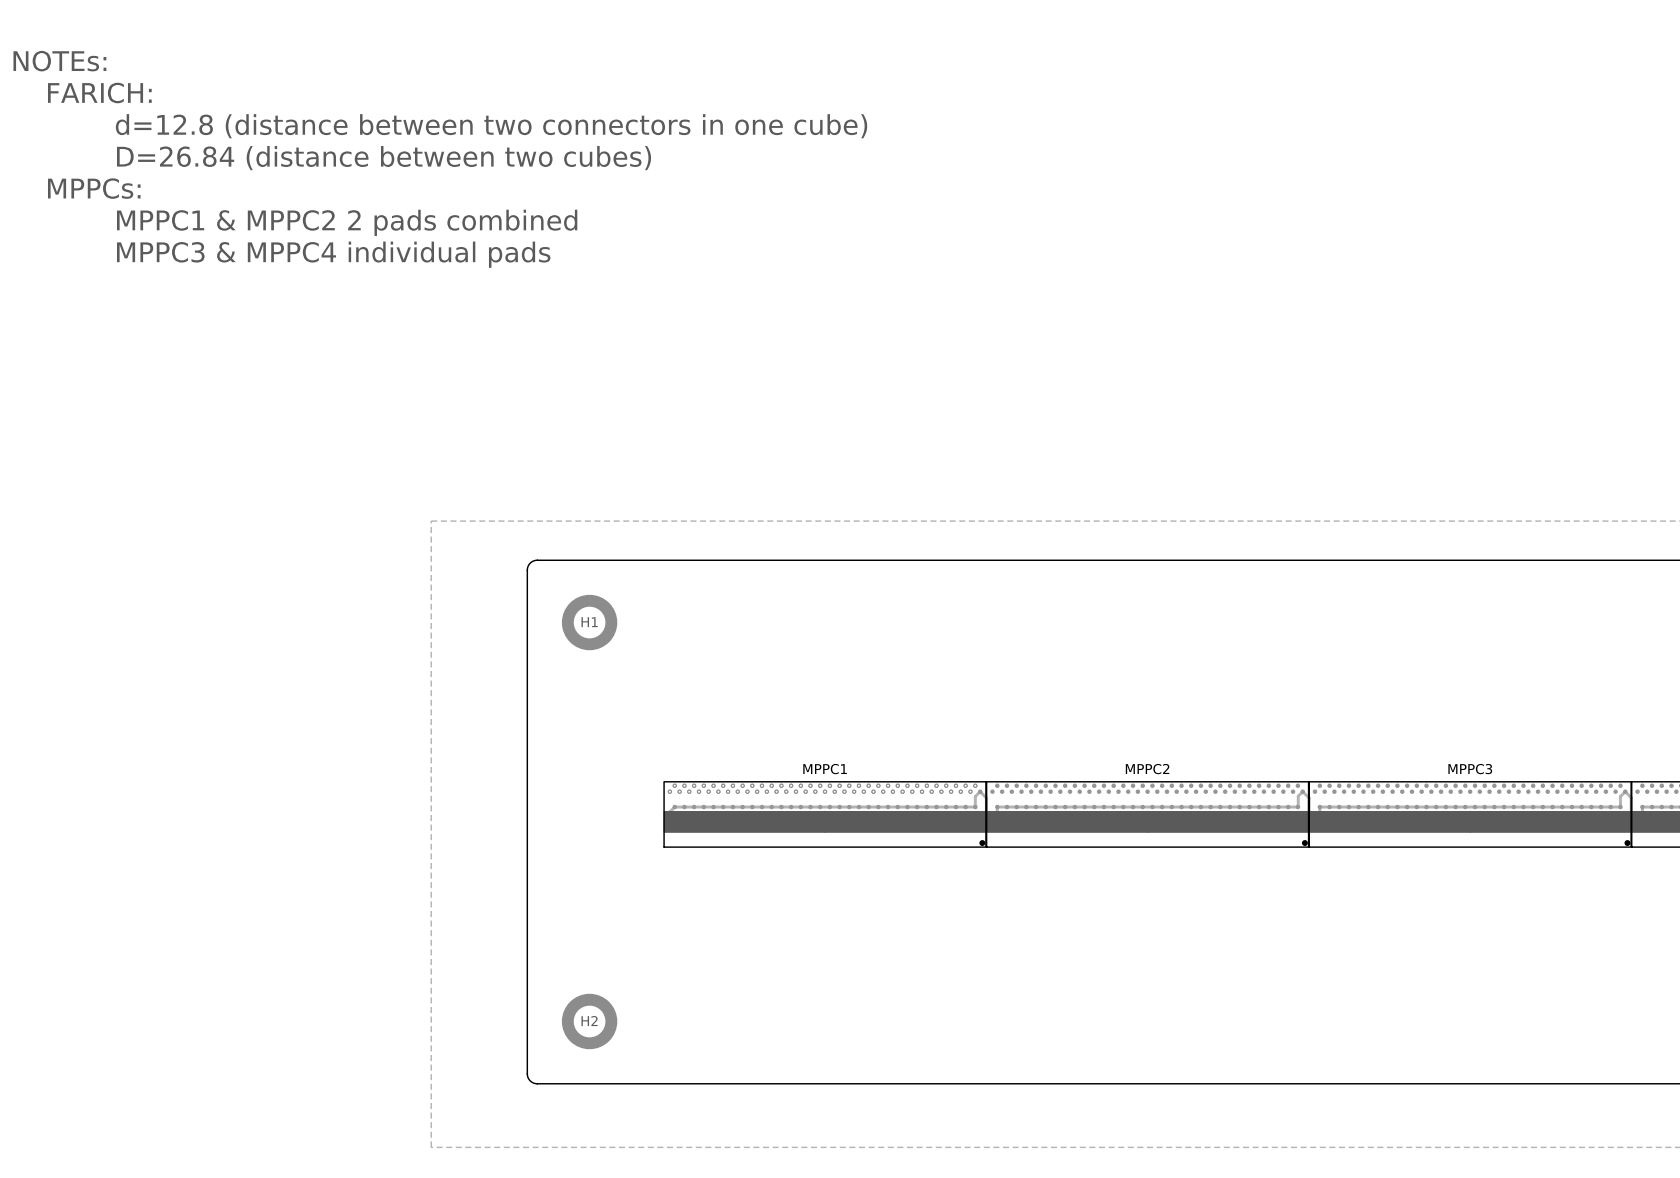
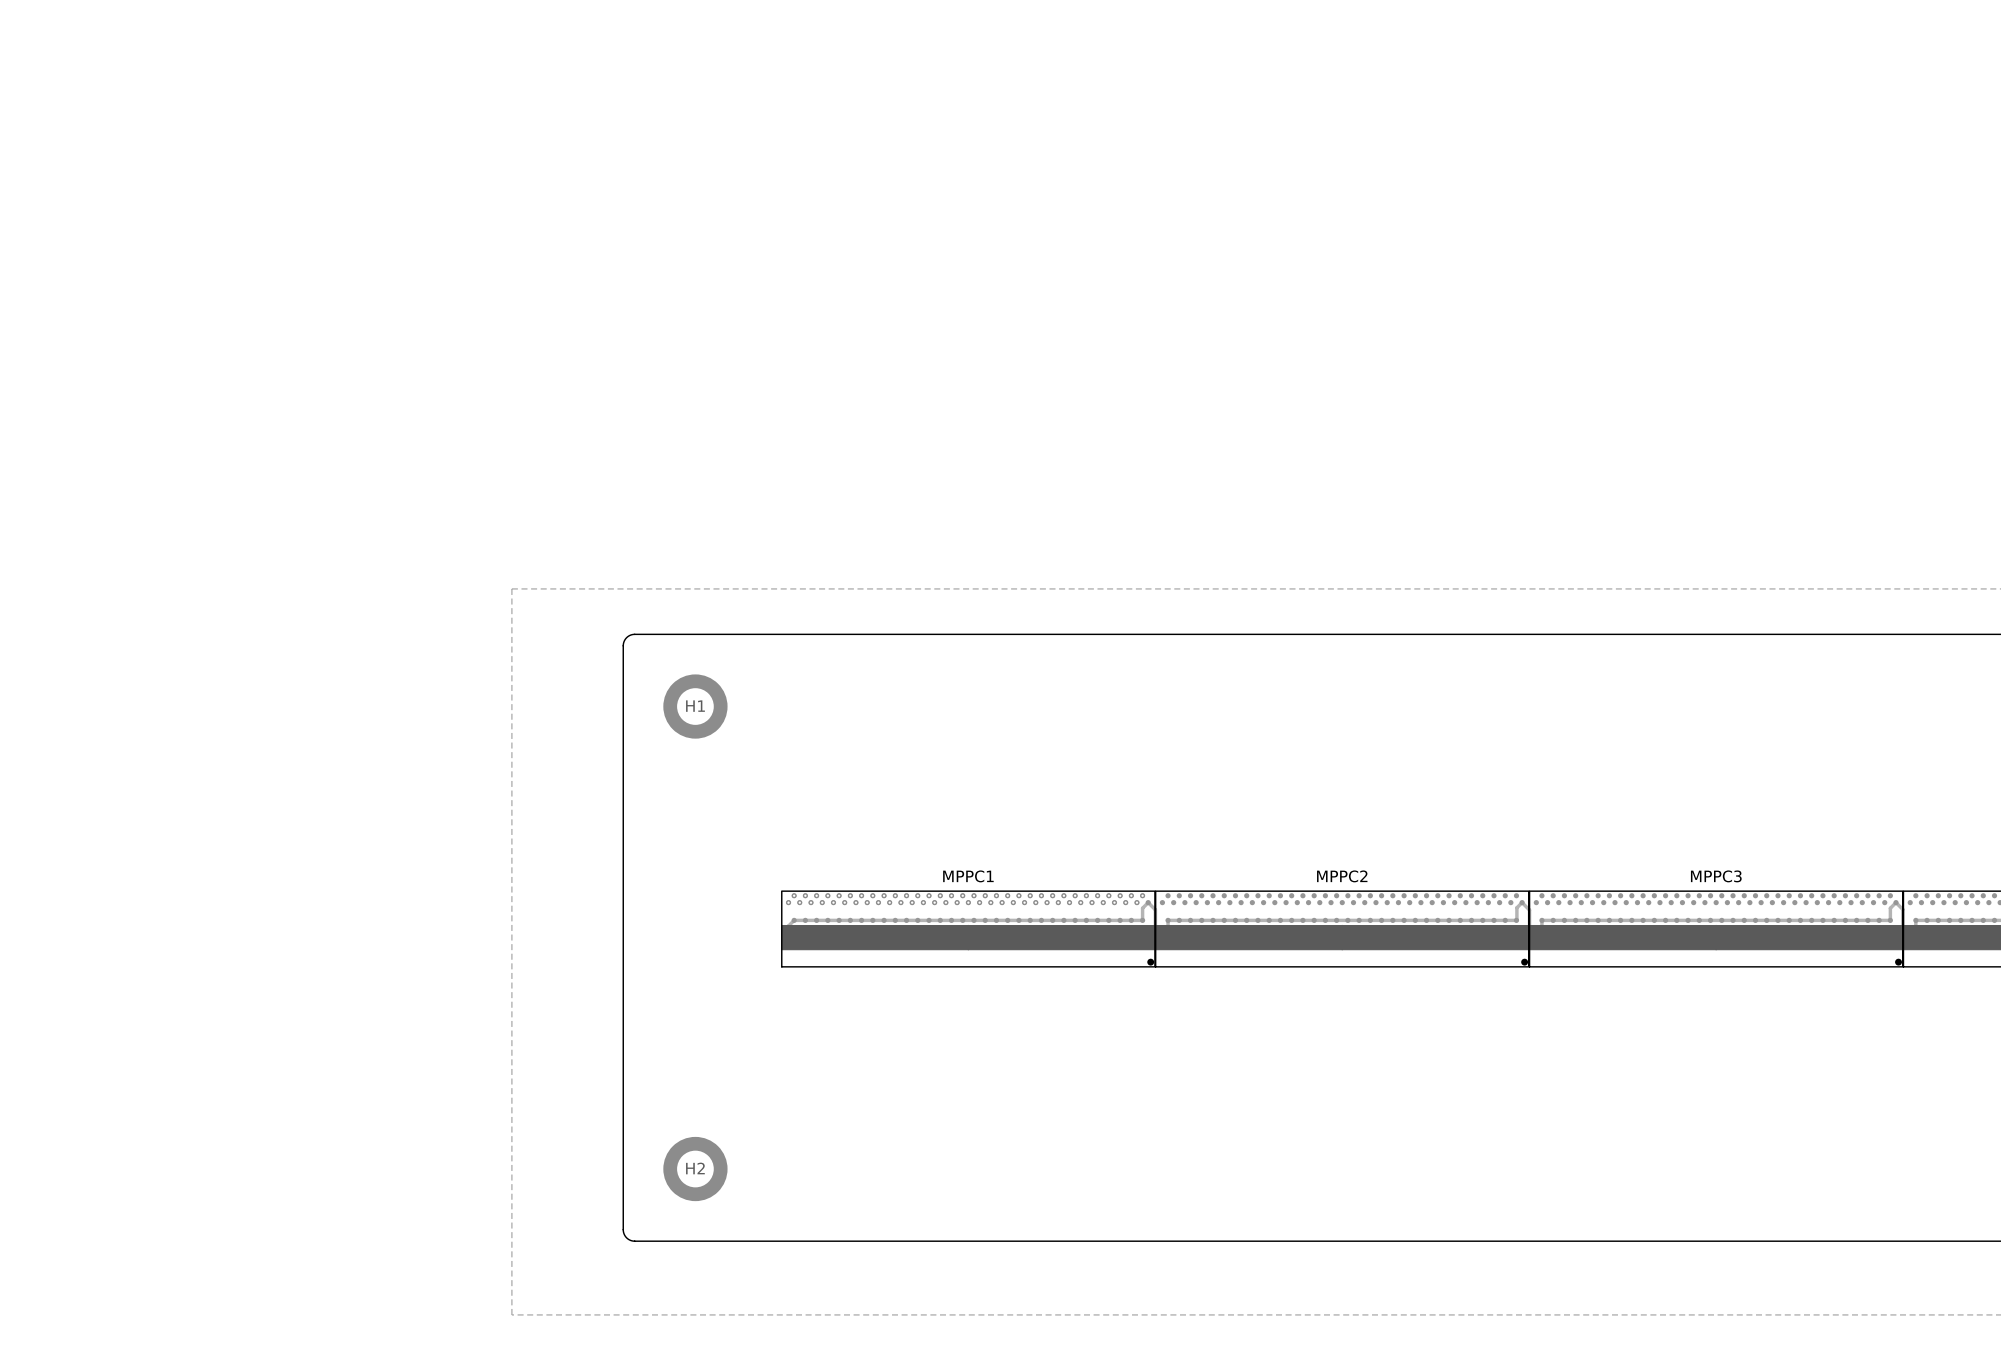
text: NOTEs: (59, 61) -> none
text: FARICH: (99, 93) -> none
text: d=12.8 (distance between two connectors in one cube) (491, 126) -> none
text: D=26.84 (distance between two cubes) (384, 158) -> none
text: MPPCs: (94, 188) -> none
text: MPPC1 & MPPC2 2 pads combined (347, 222) -> none
text: MPPC3 & MPPC4 individual pads (333, 254) -> none

